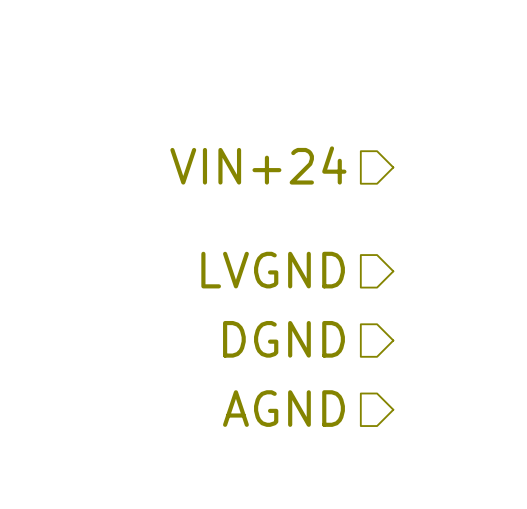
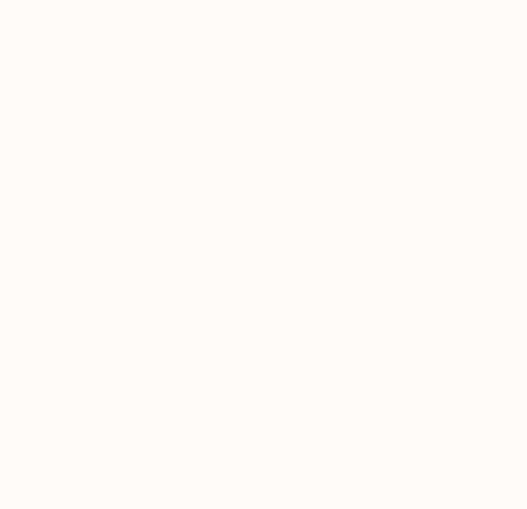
hierarchical label: VIN+24 (258, 165) -> none
hierarchical label: LVGND (273, 270) -> none
hierarchical label: DGND (283, 339) -> none
hierarchical label: AGND (283, 408) -> none

